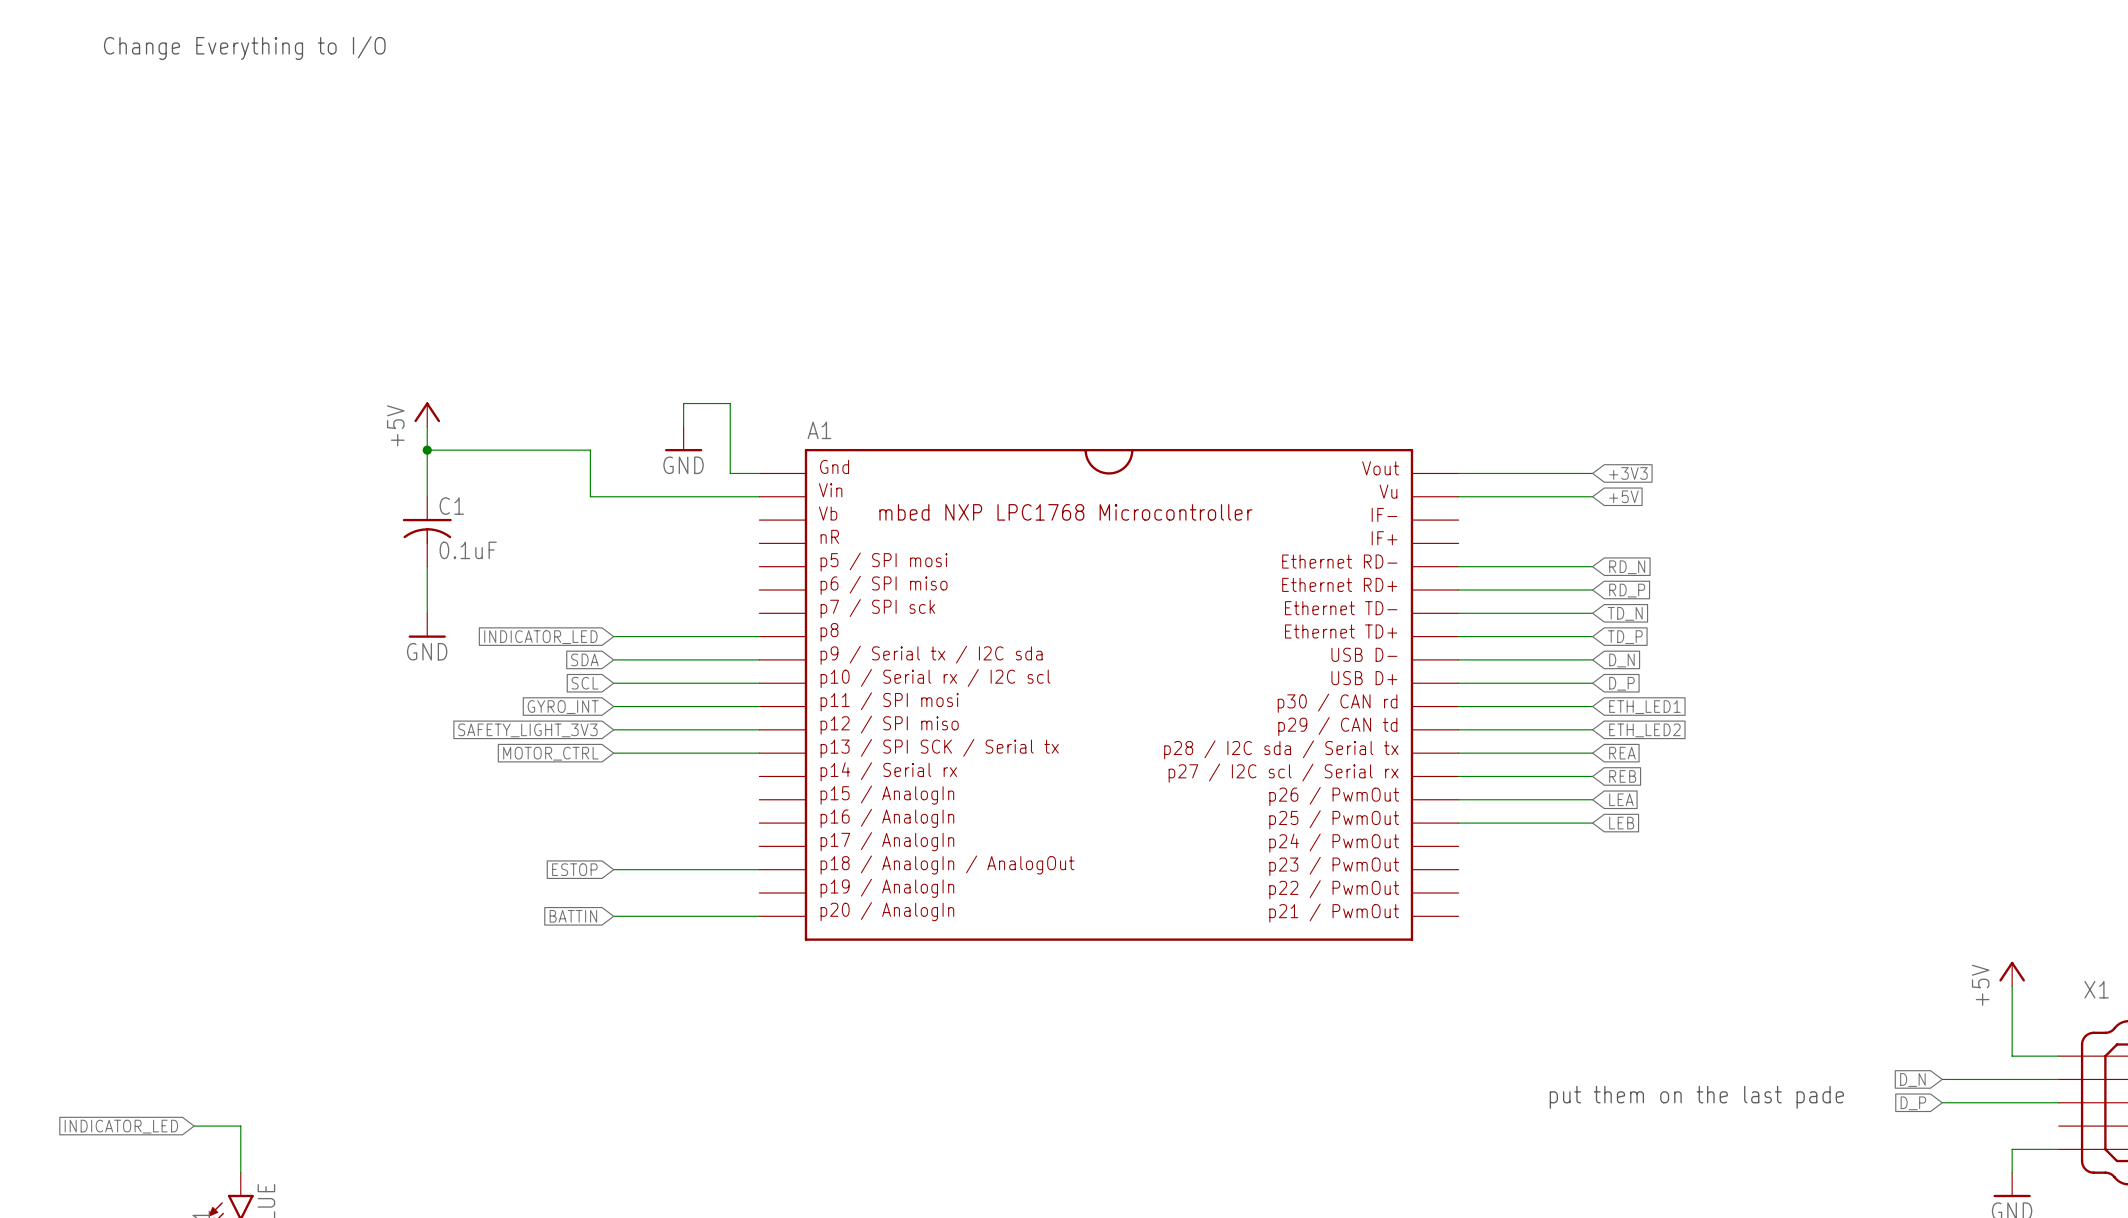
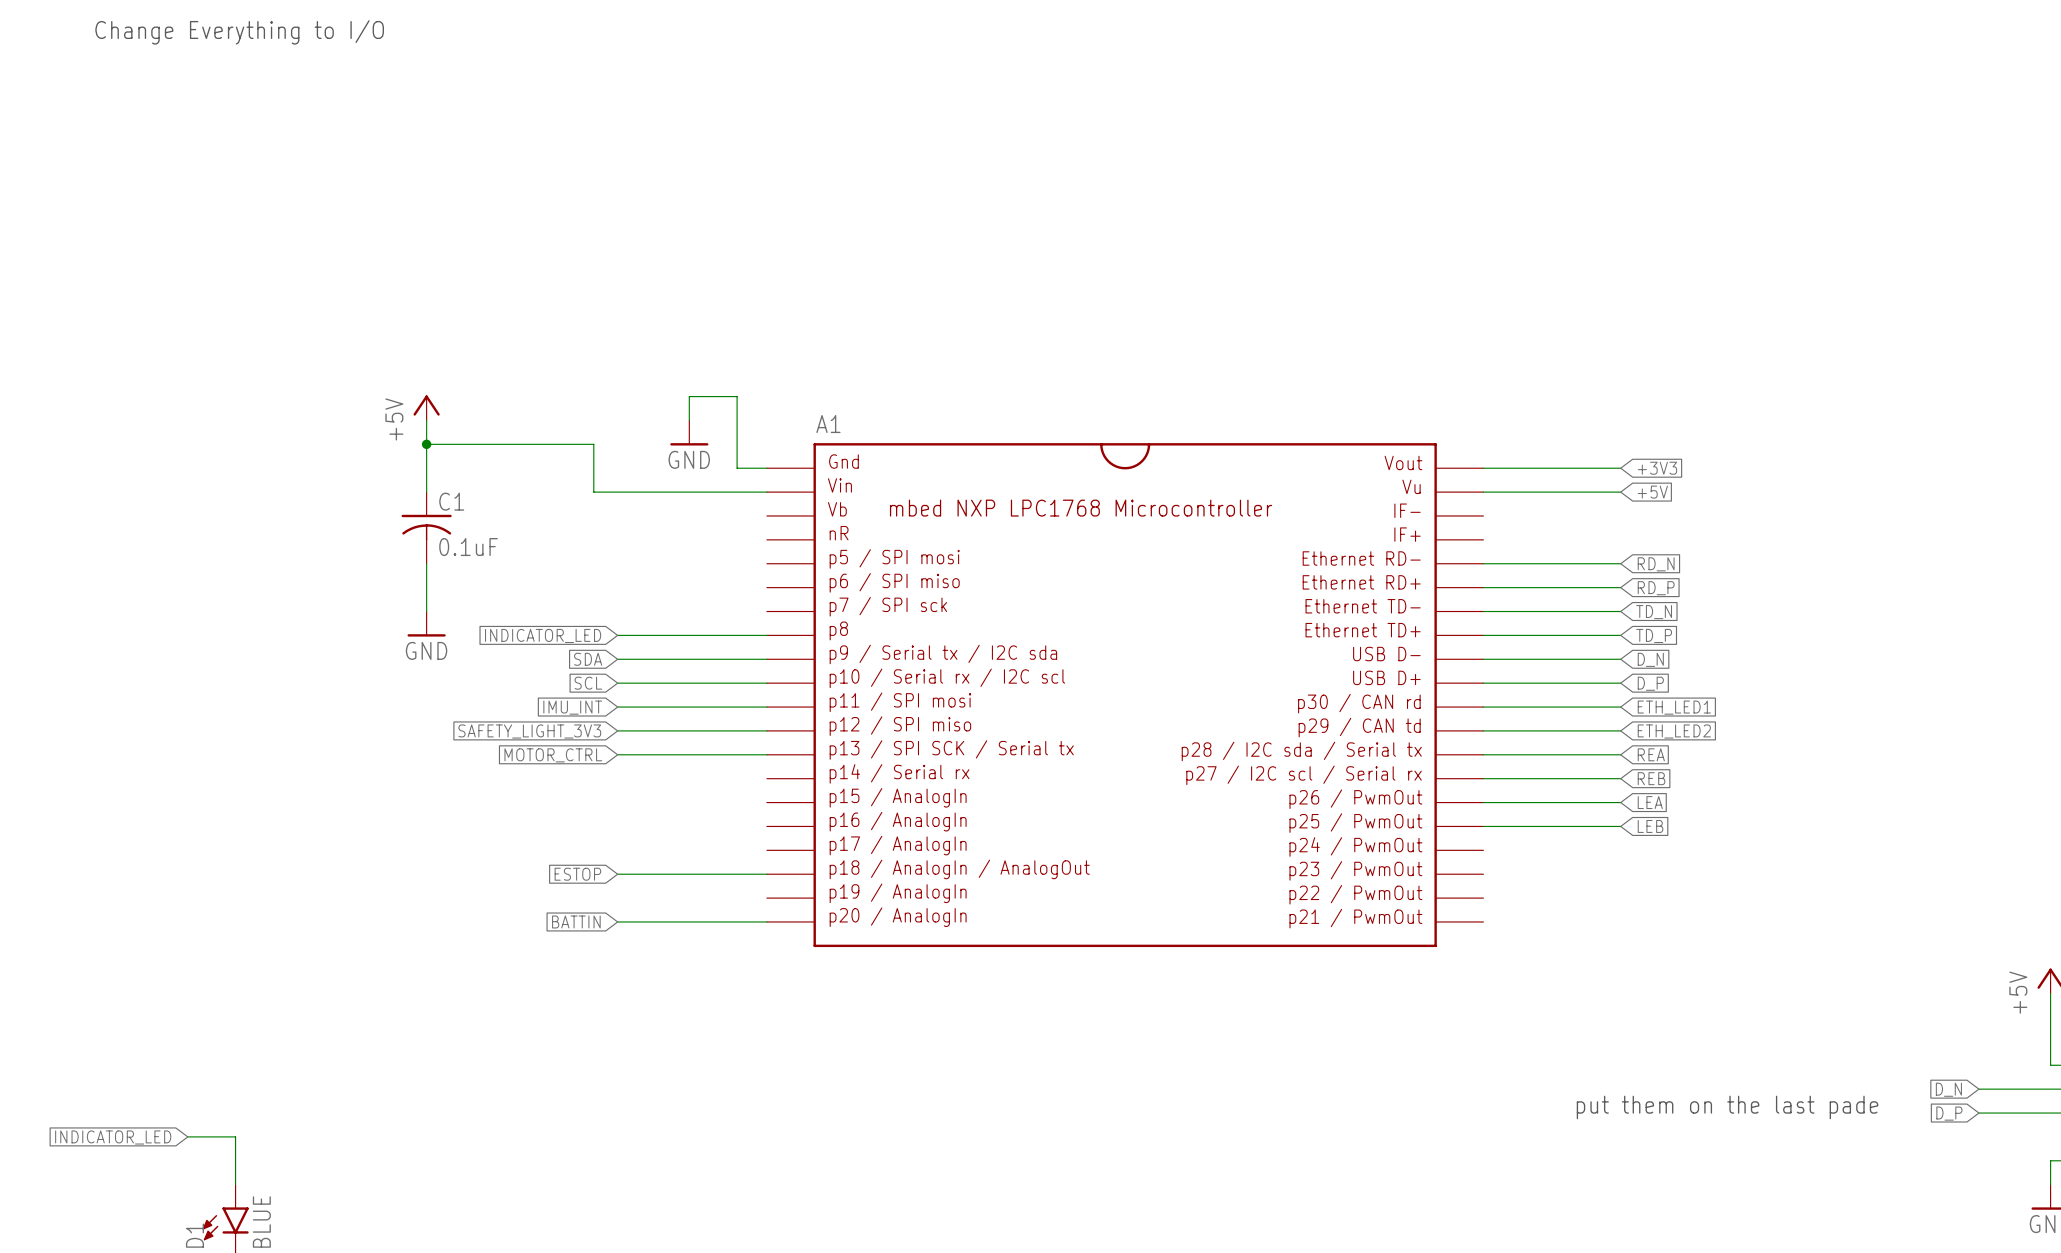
global label: GYRO_INT (563, 707) -> IMU_INT (572, 707)

